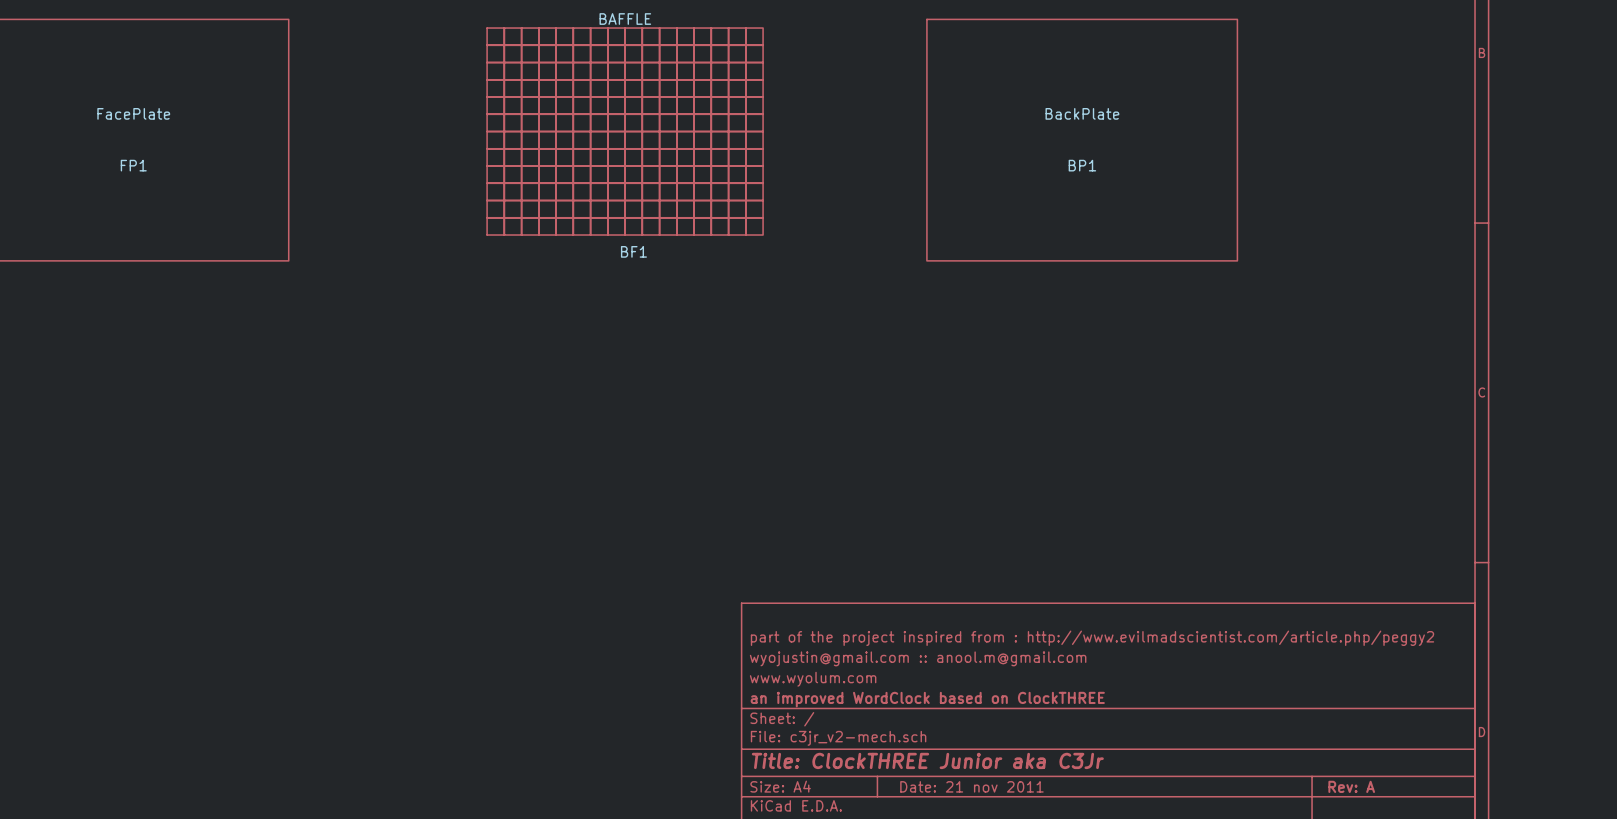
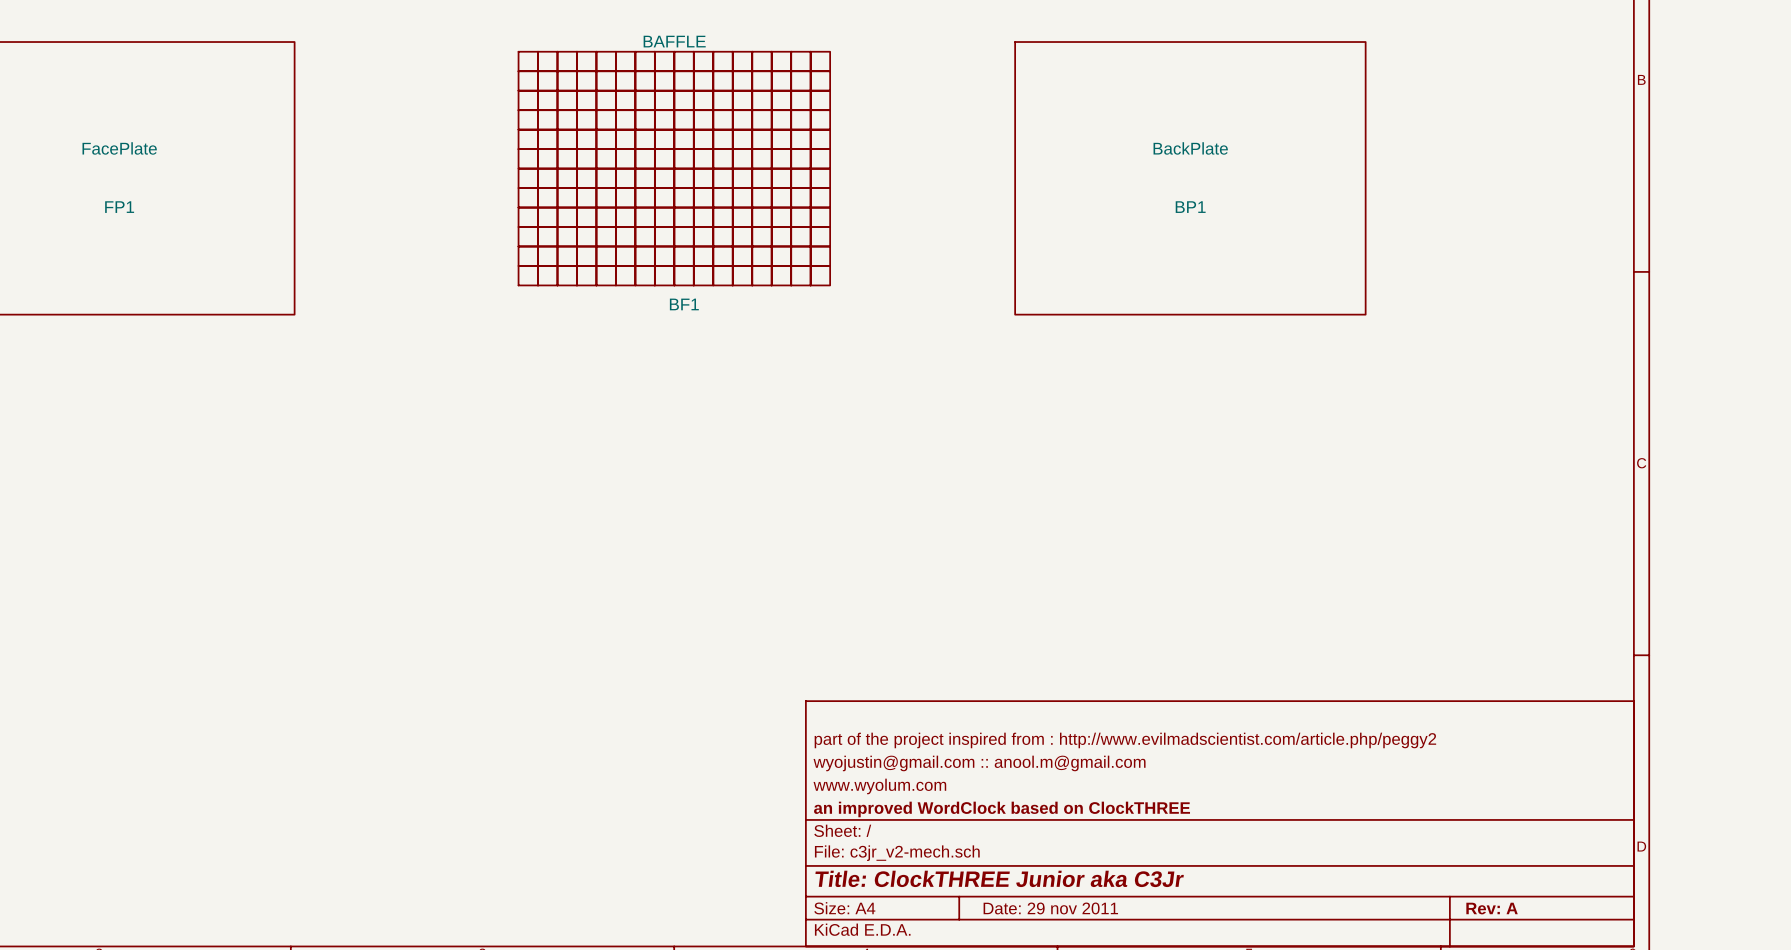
title block: Date: 21 nov 2011 (971, 786) -> Date: 29 nov 2011 (1050, 908)

